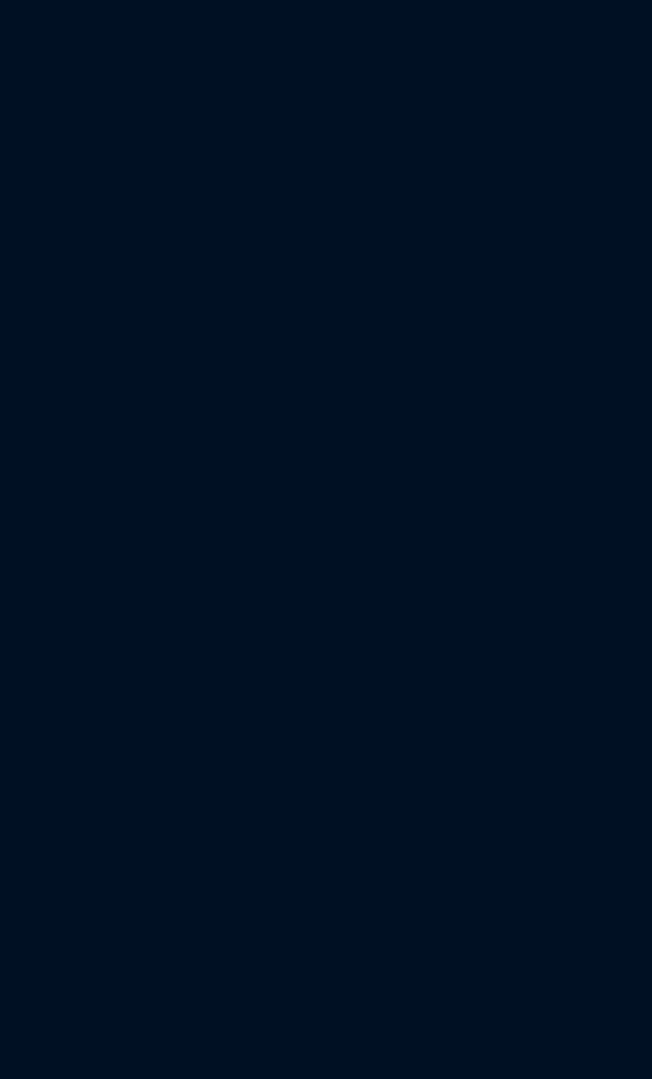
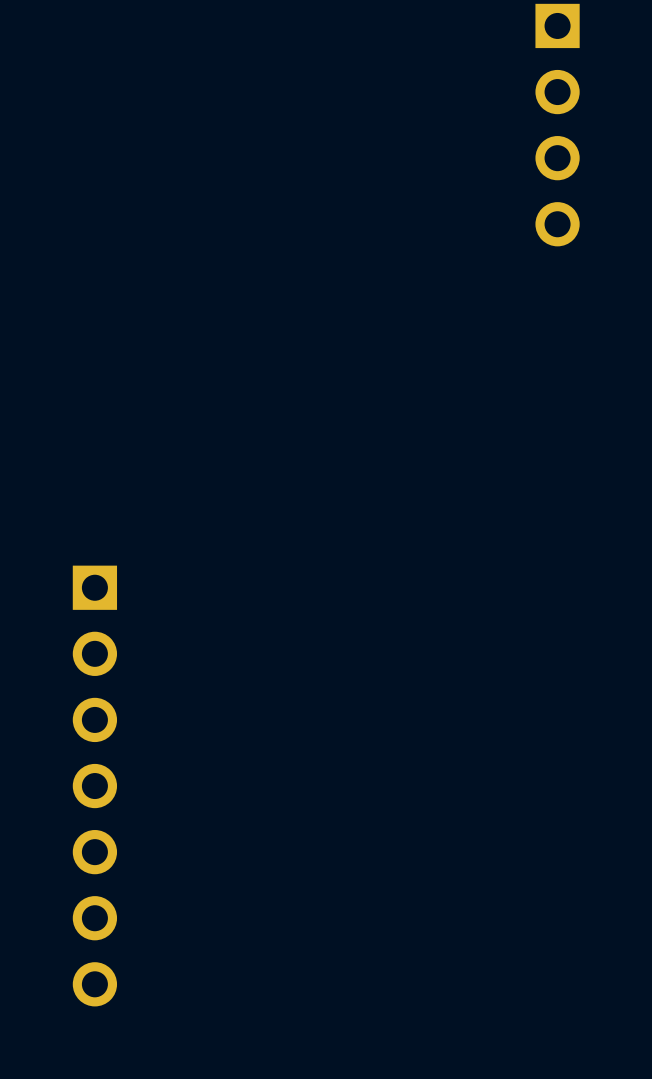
part: none -> (557, 125)
part: none -> (94, 786)

